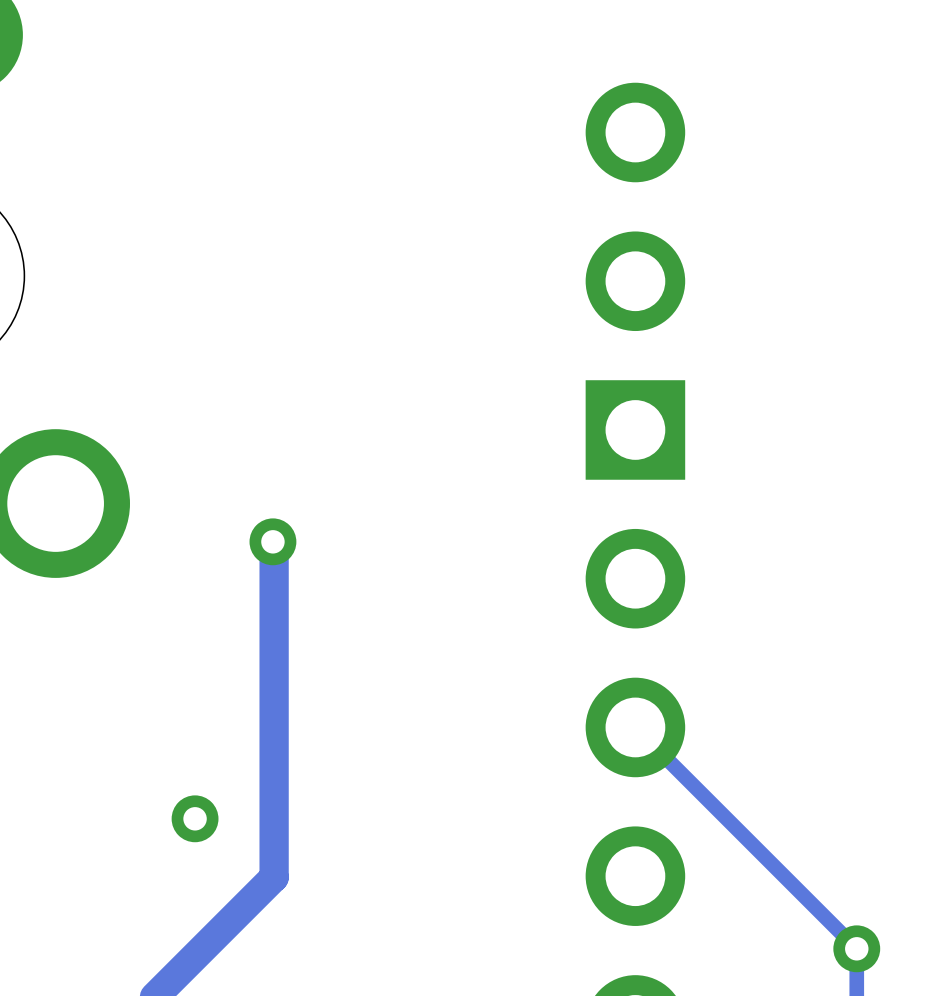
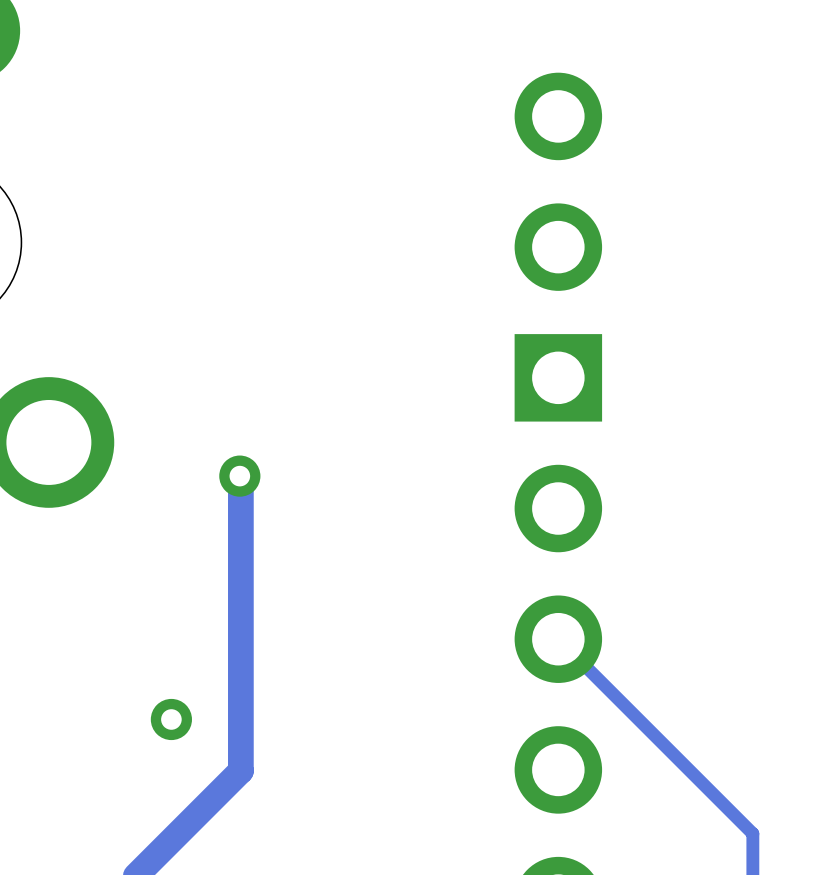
via: (856, 948) -> none

